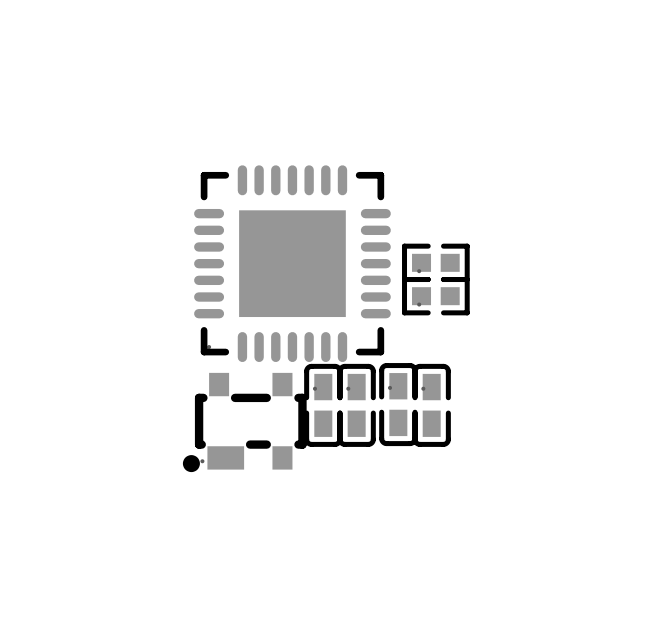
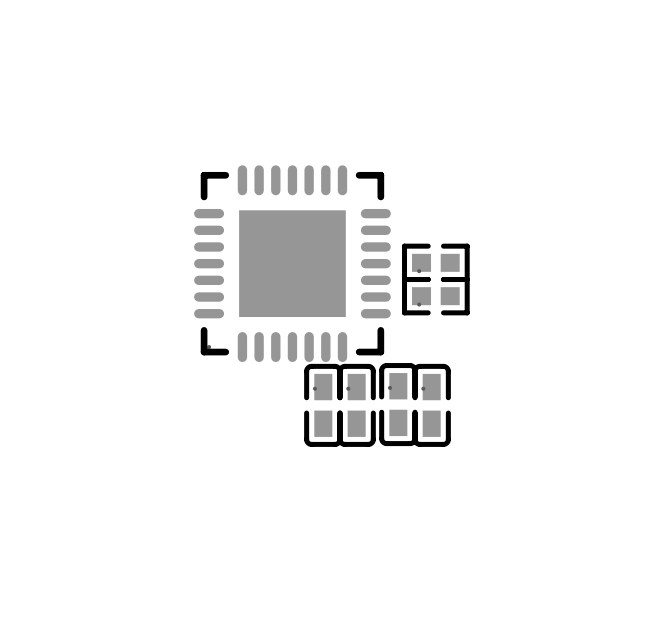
part: (244, 422) -> none

